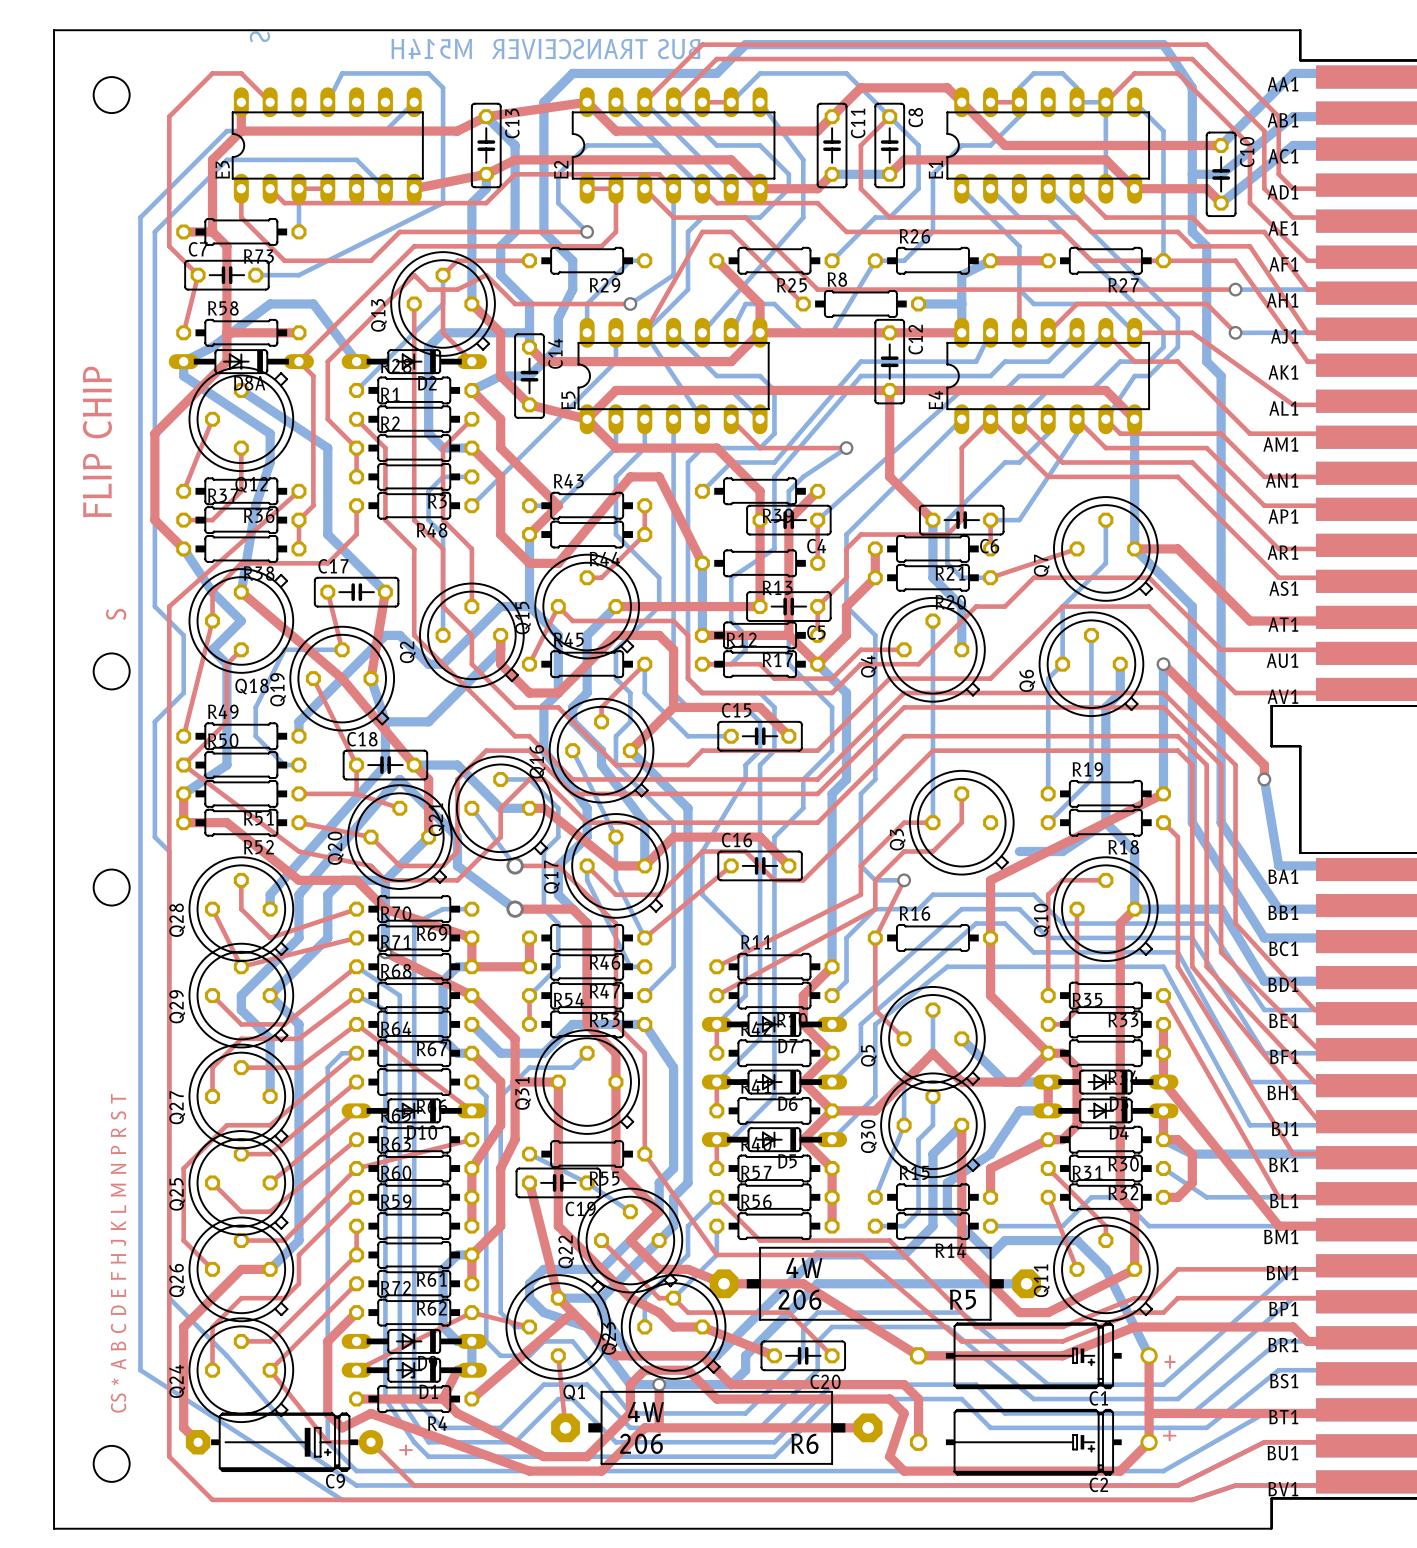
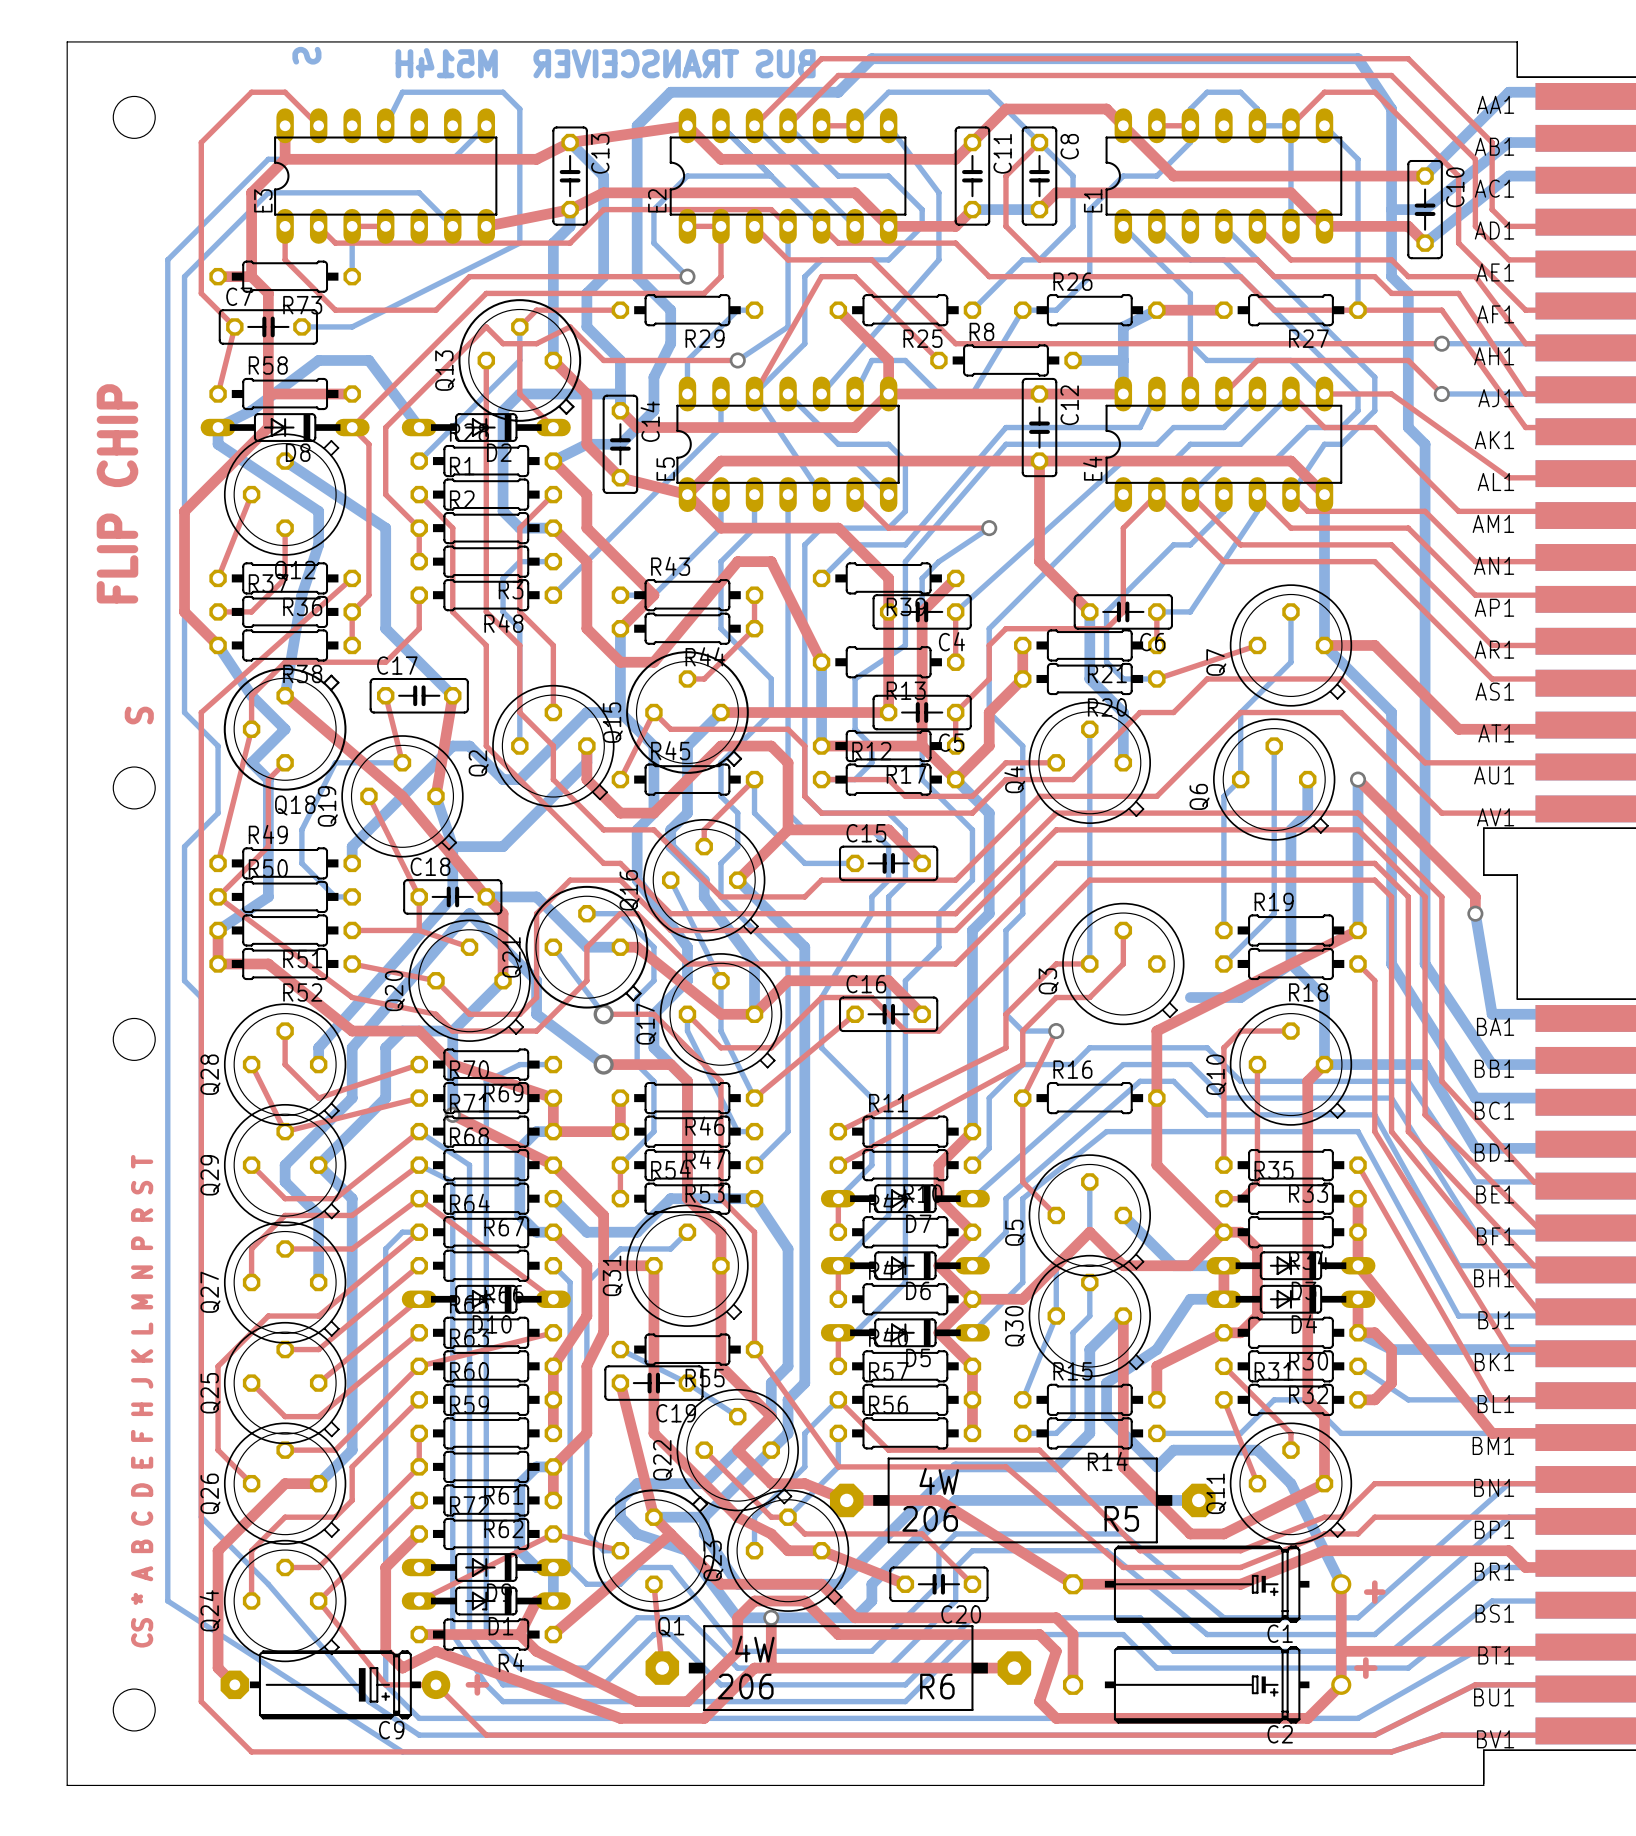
D8A name: D8A (249, 383) -> D8 (298, 452)

